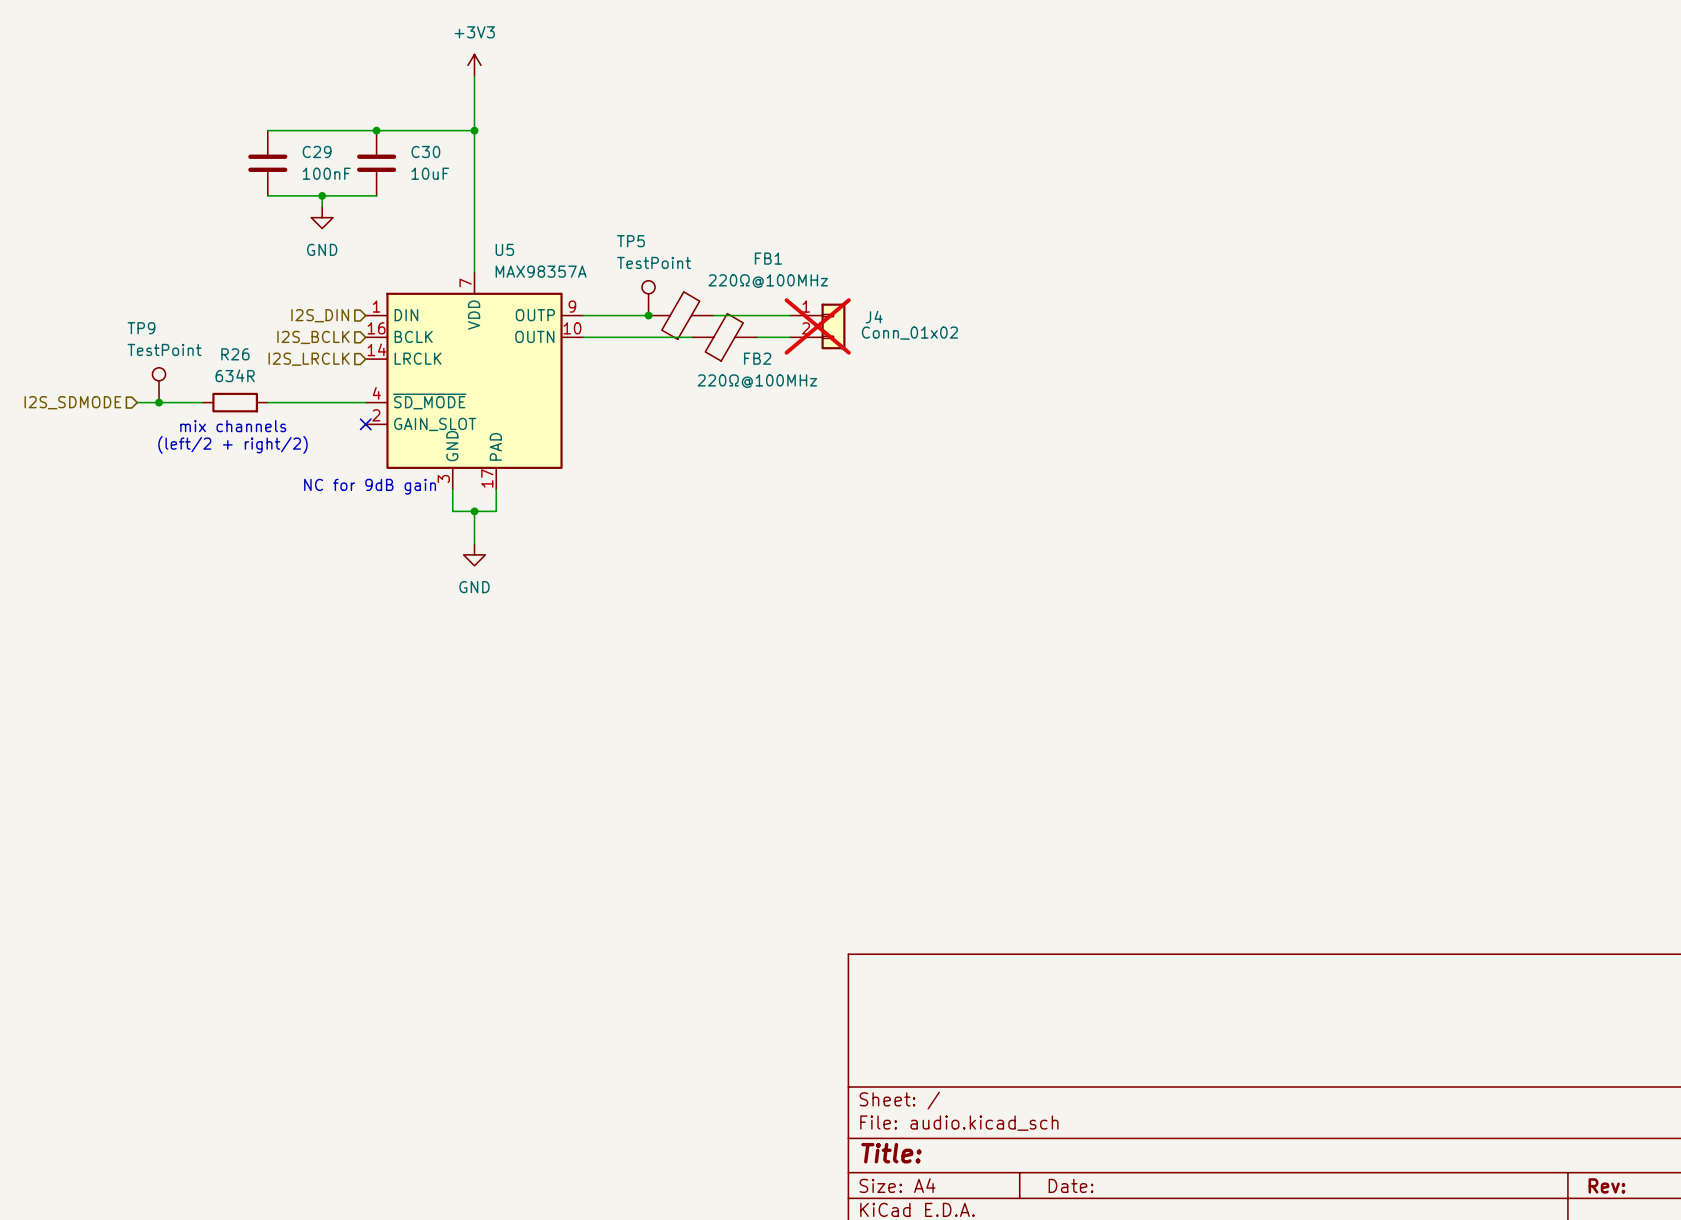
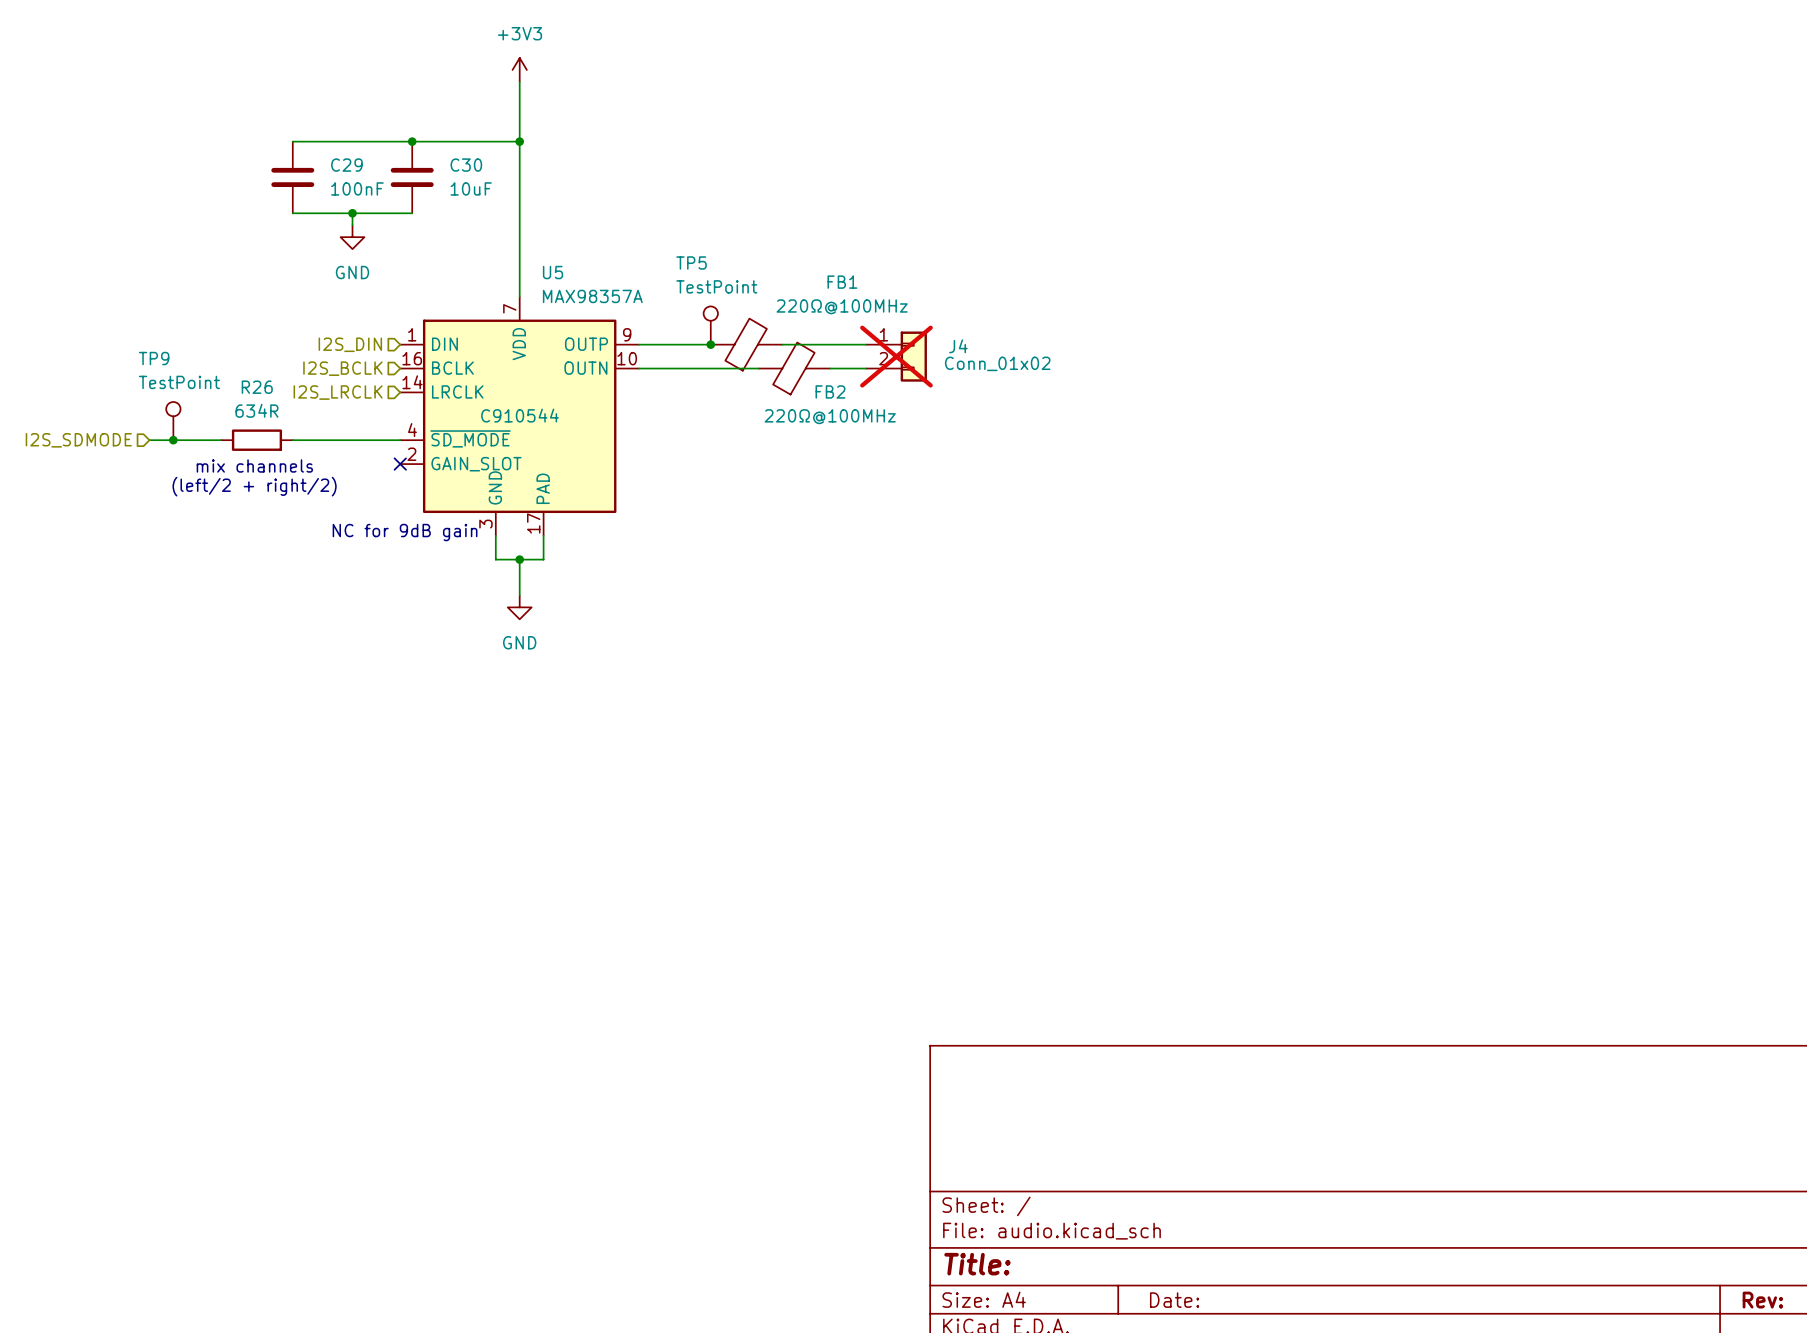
U5 text: none -> C910544 (519, 415)

